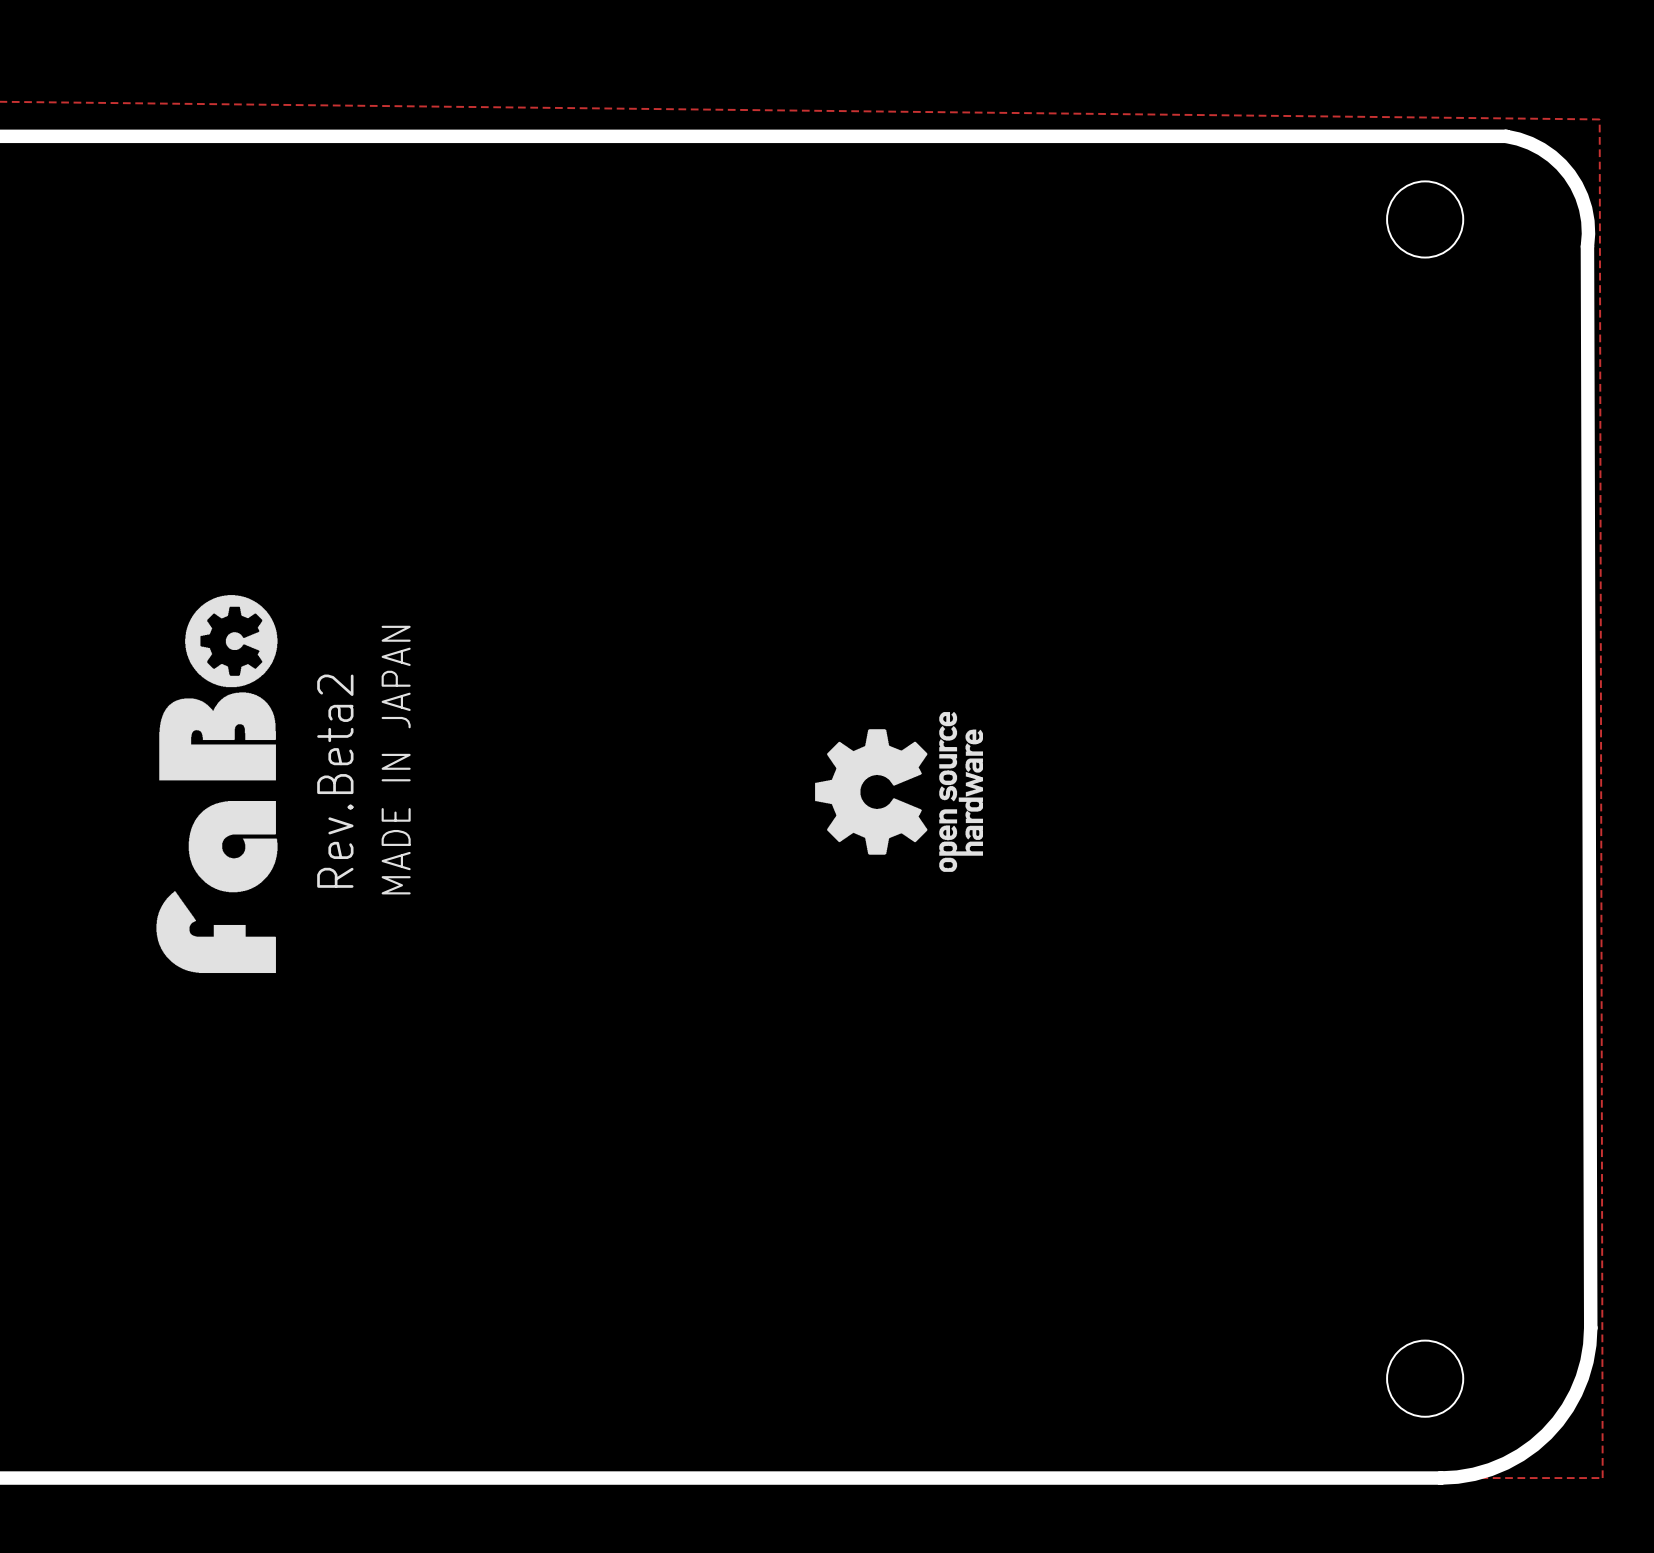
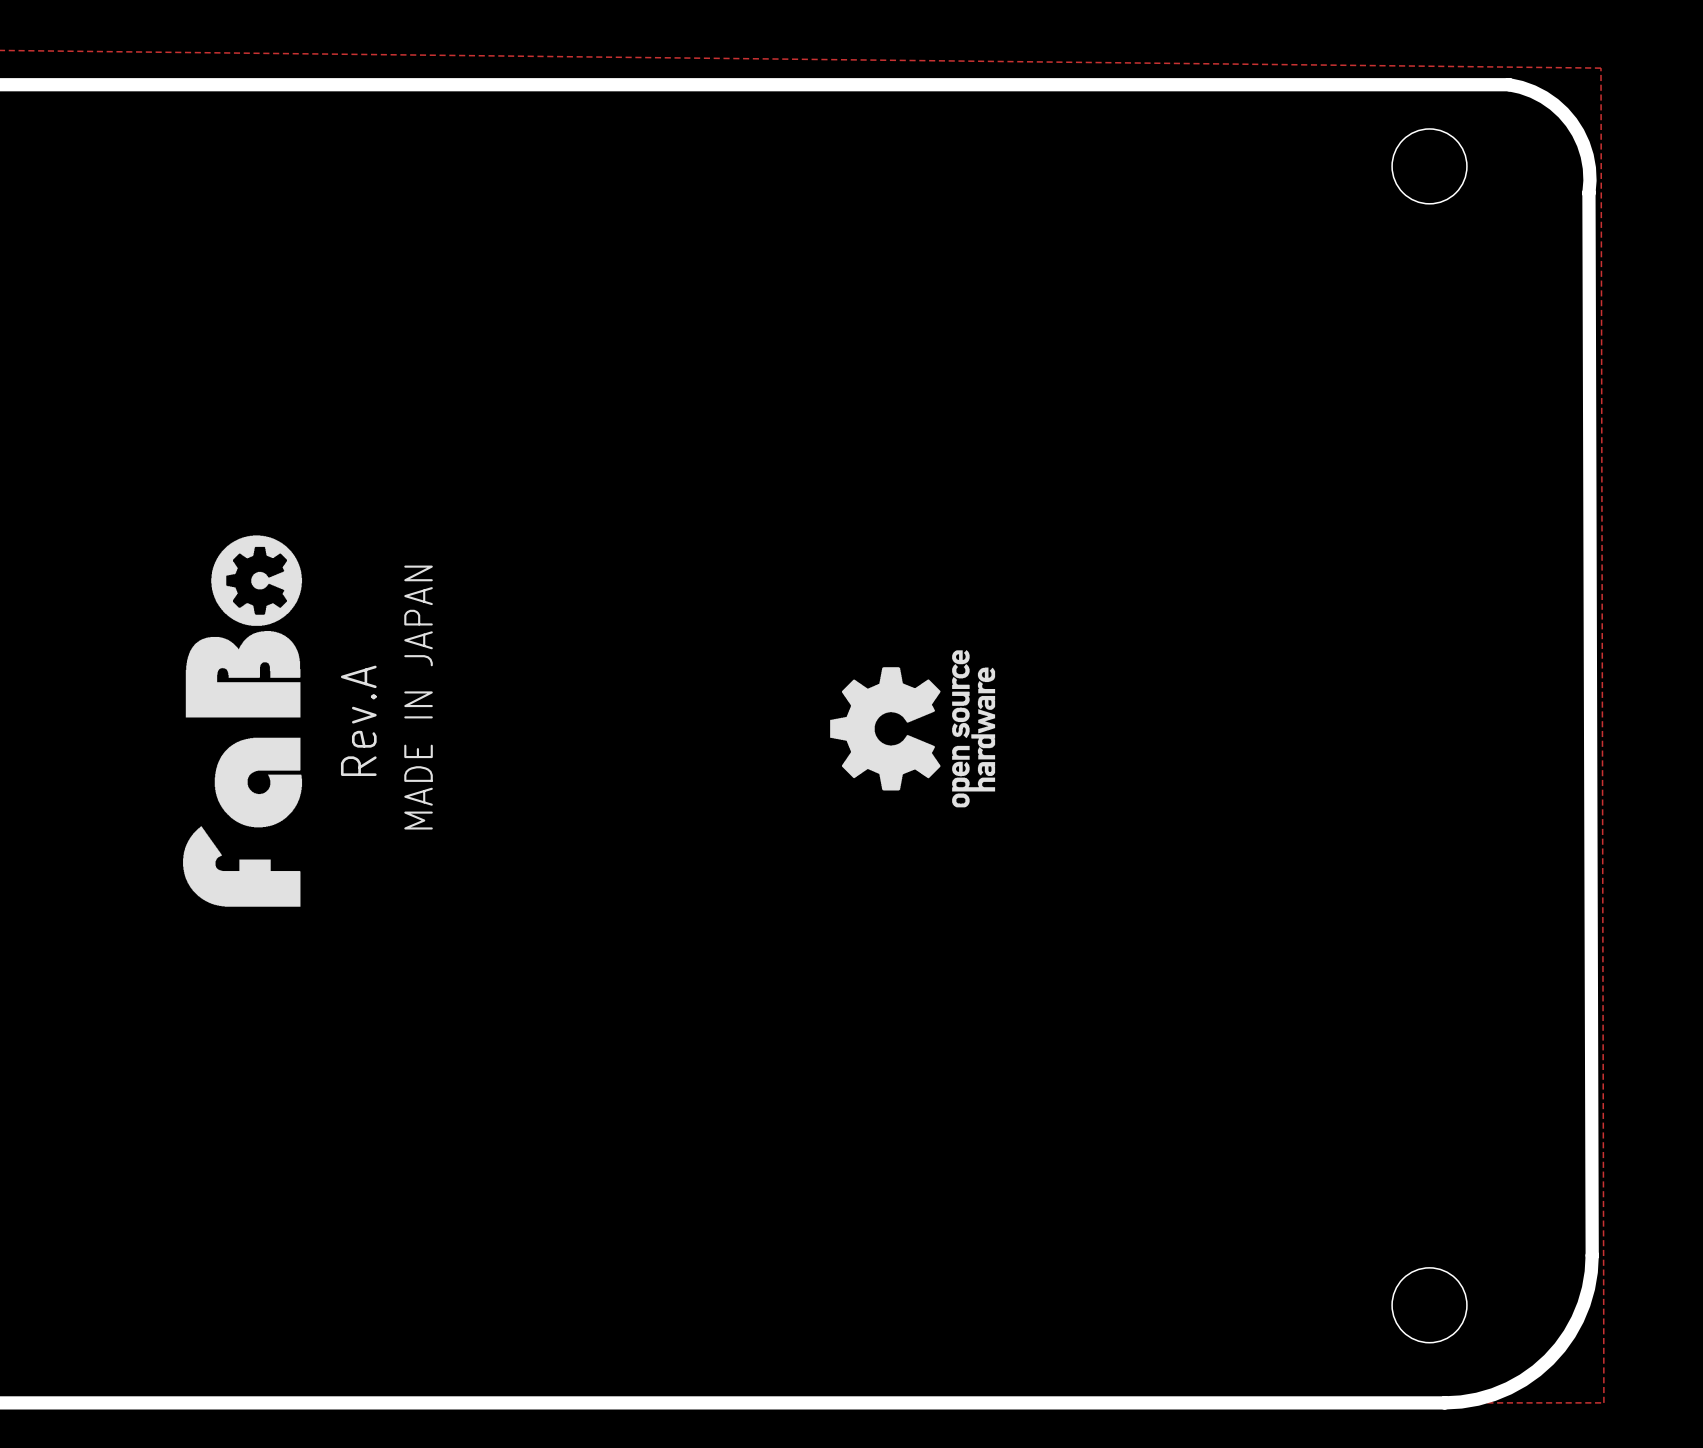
text: Rev.Beta2 (335, 781) -> none
text: none -> Rev.A (358, 720)

